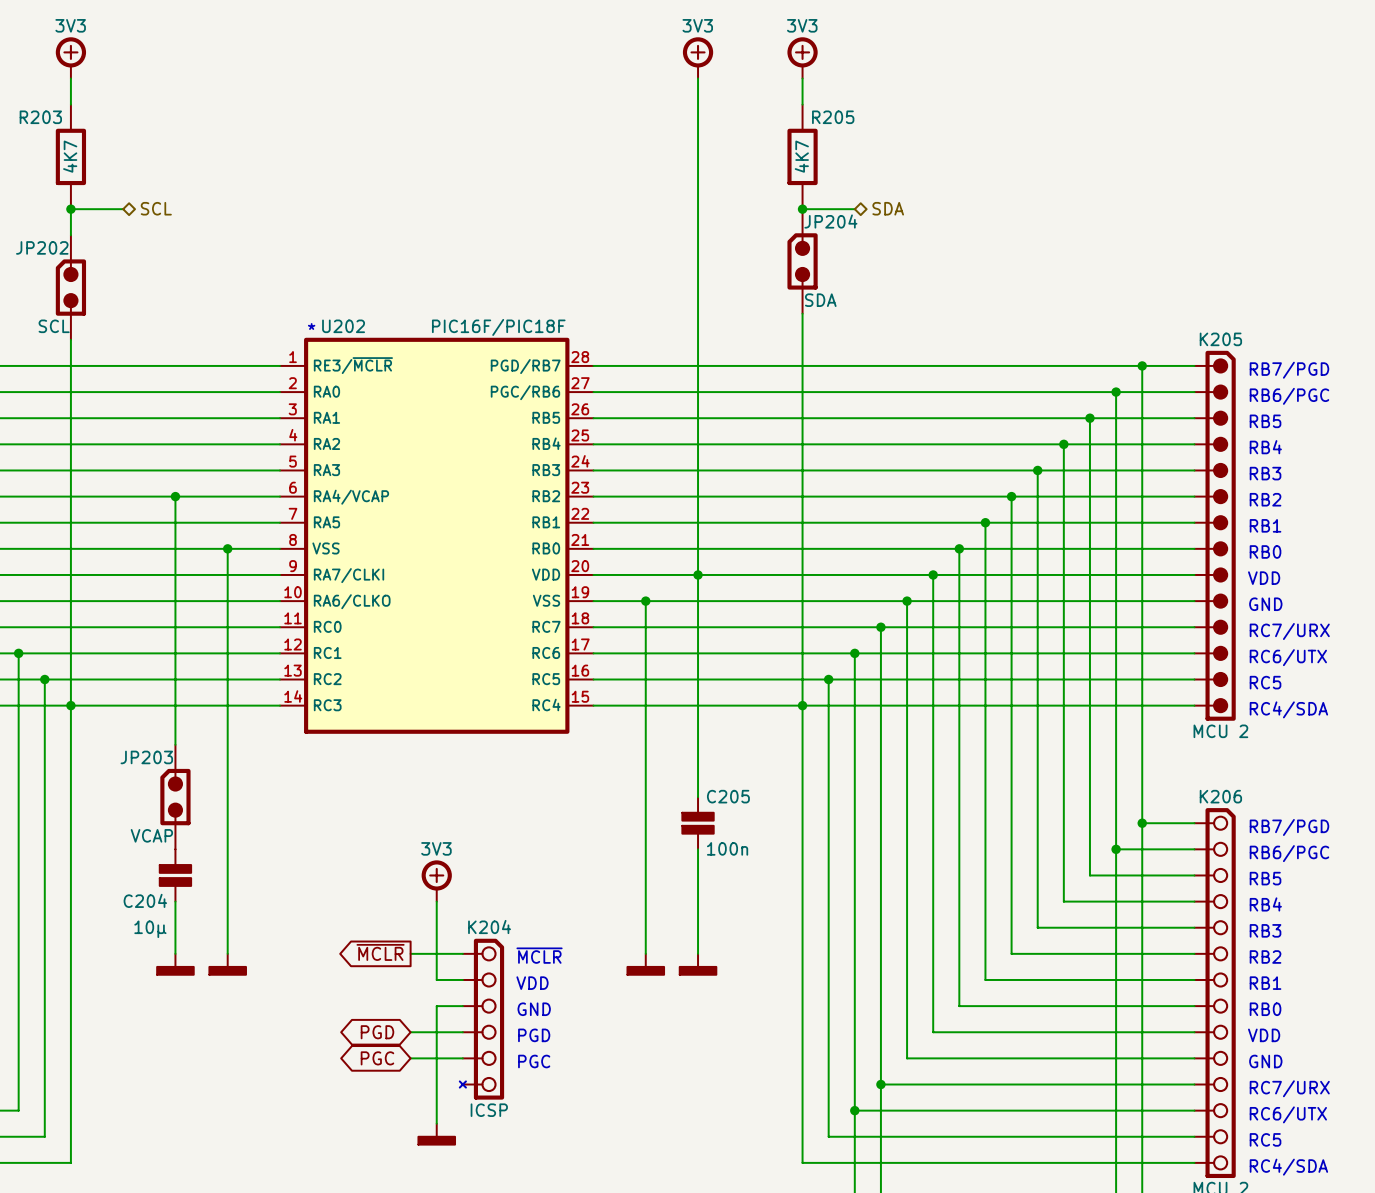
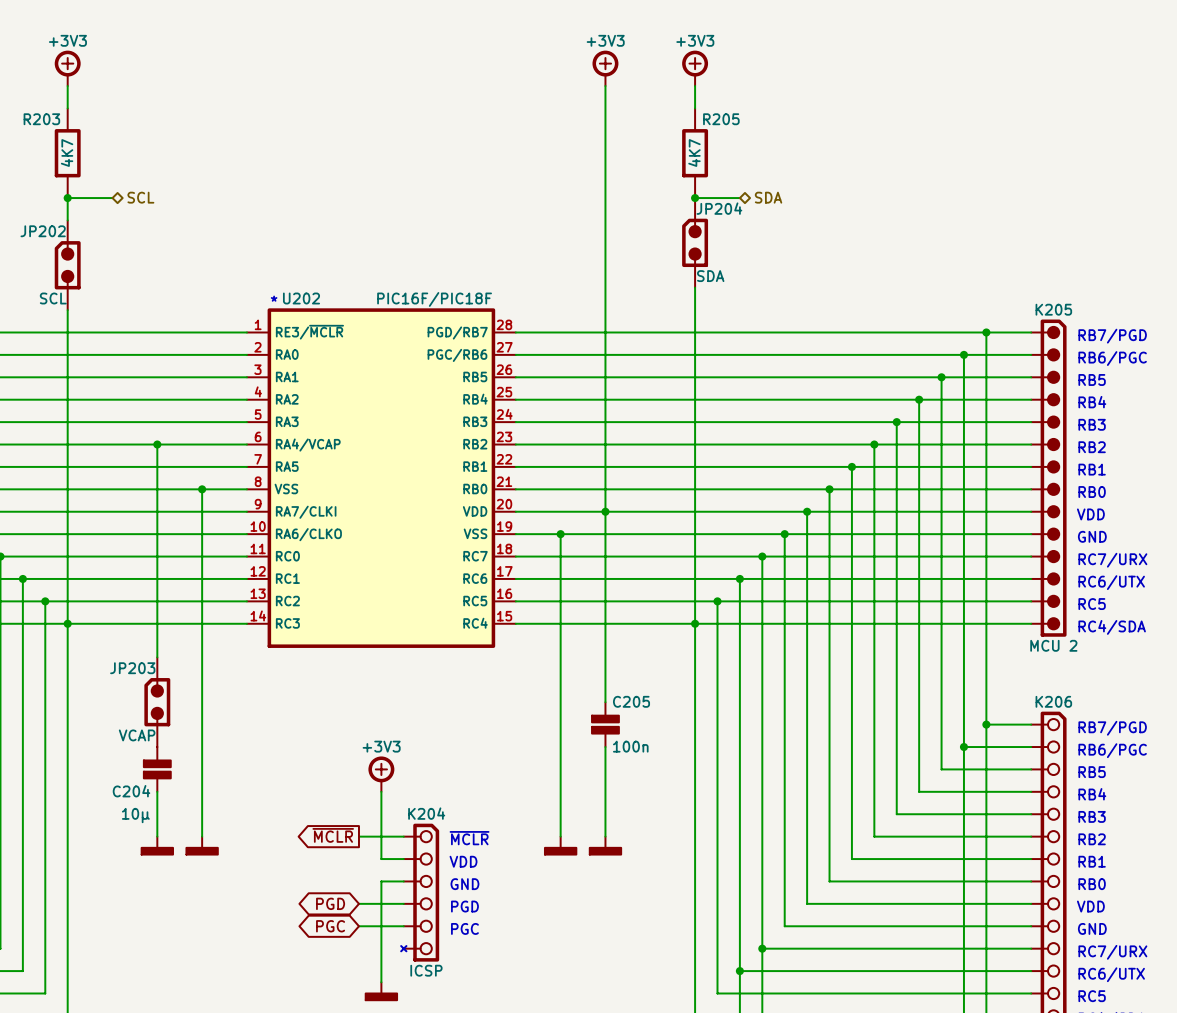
power symbol text: 3V3 (70, 25) -> +3V3 (67, 40)
power symbol text: 3V3 (697, 25) -> +3V3 (605, 40)
power symbol text: 3V3 (802, 25) -> +3V3 (695, 40)
power symbol text: 3V3 (436, 848) -> +3V3 (381, 746)

